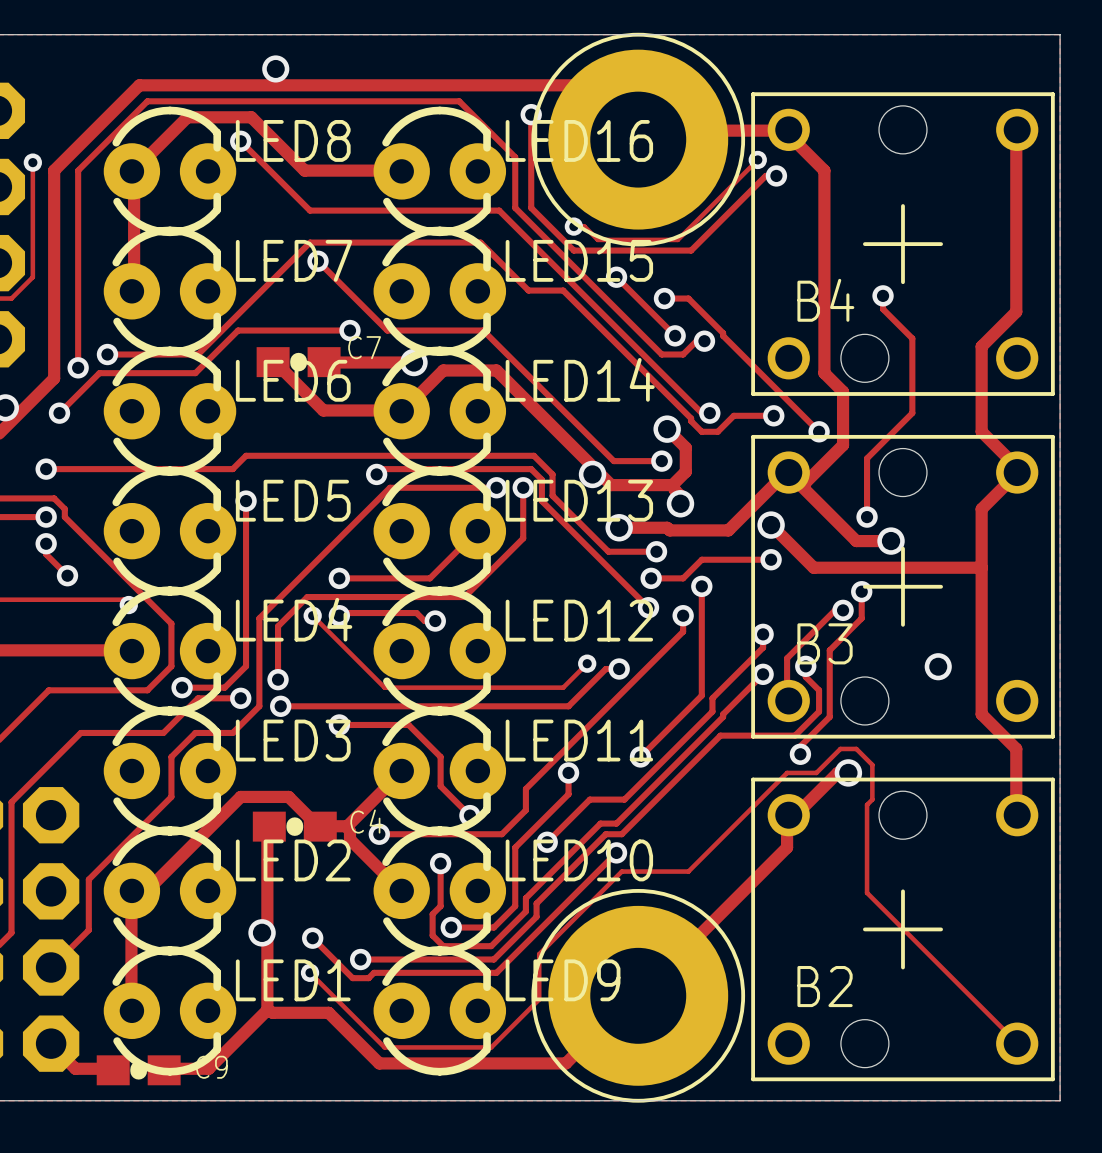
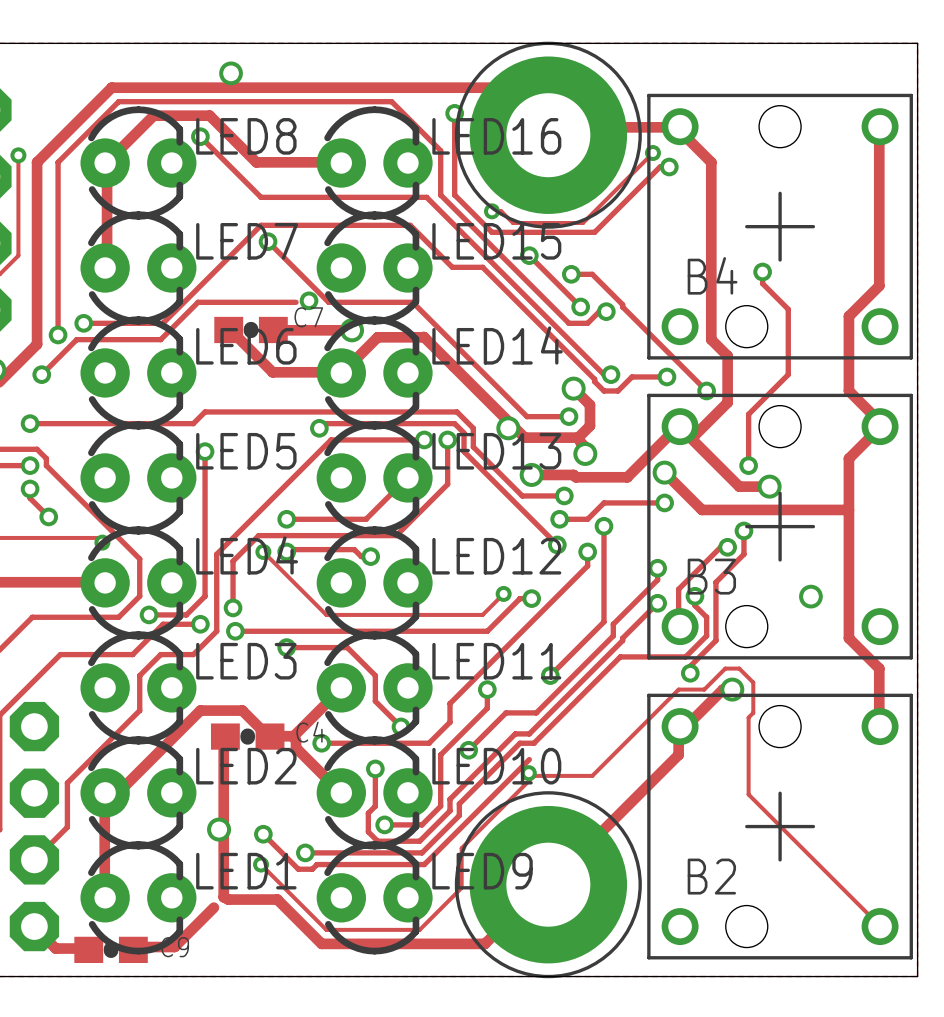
via position: (350, 330) -> (309, 300)
via position: (616, 852) -> (528, 773)
track: (267, 1010) (208, 1068) (164, 1070) -> (213, 907) (174, 947) (135, 947) (133, 949)

